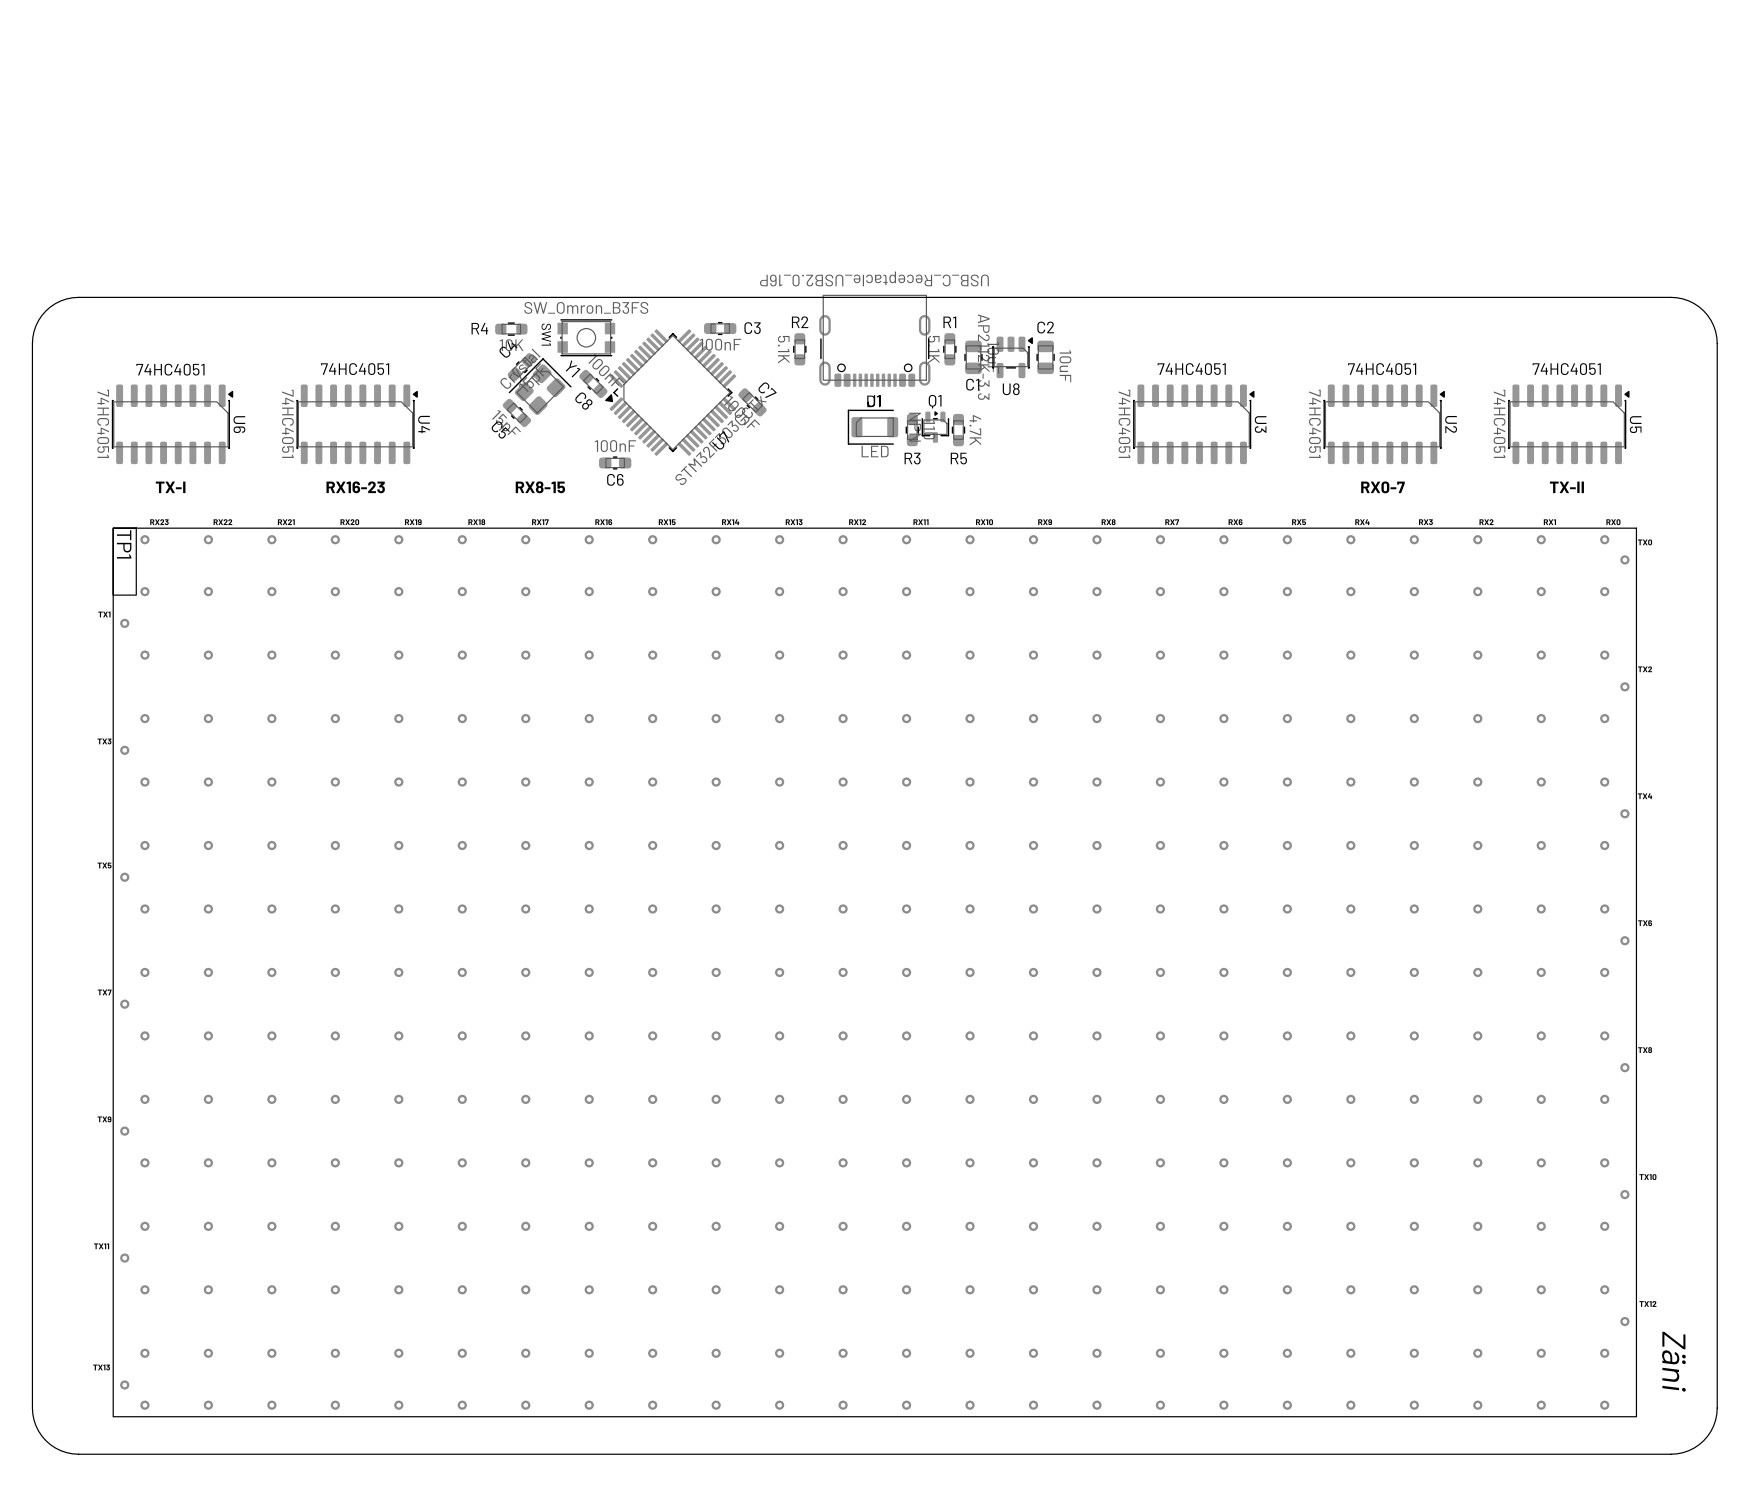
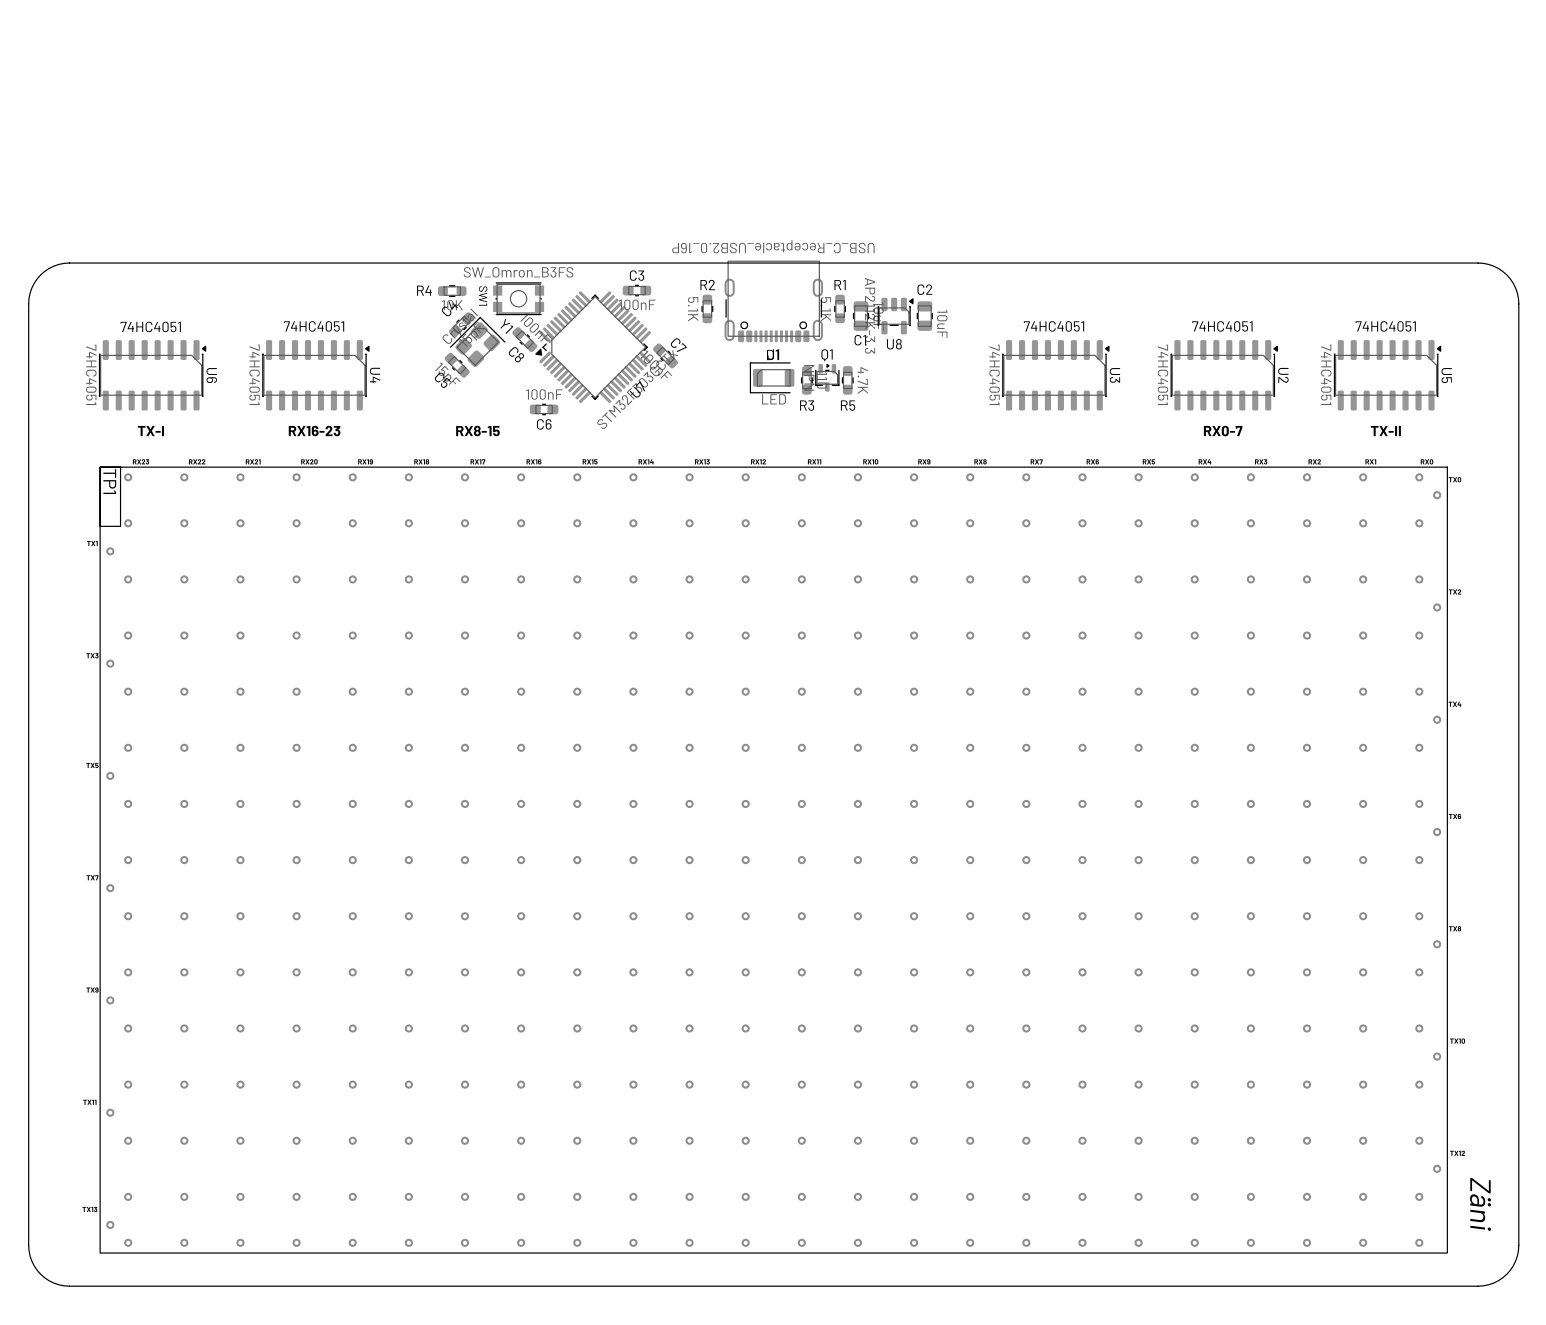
C3 name position: C3 (752, 328) -> C3 (637, 275)

